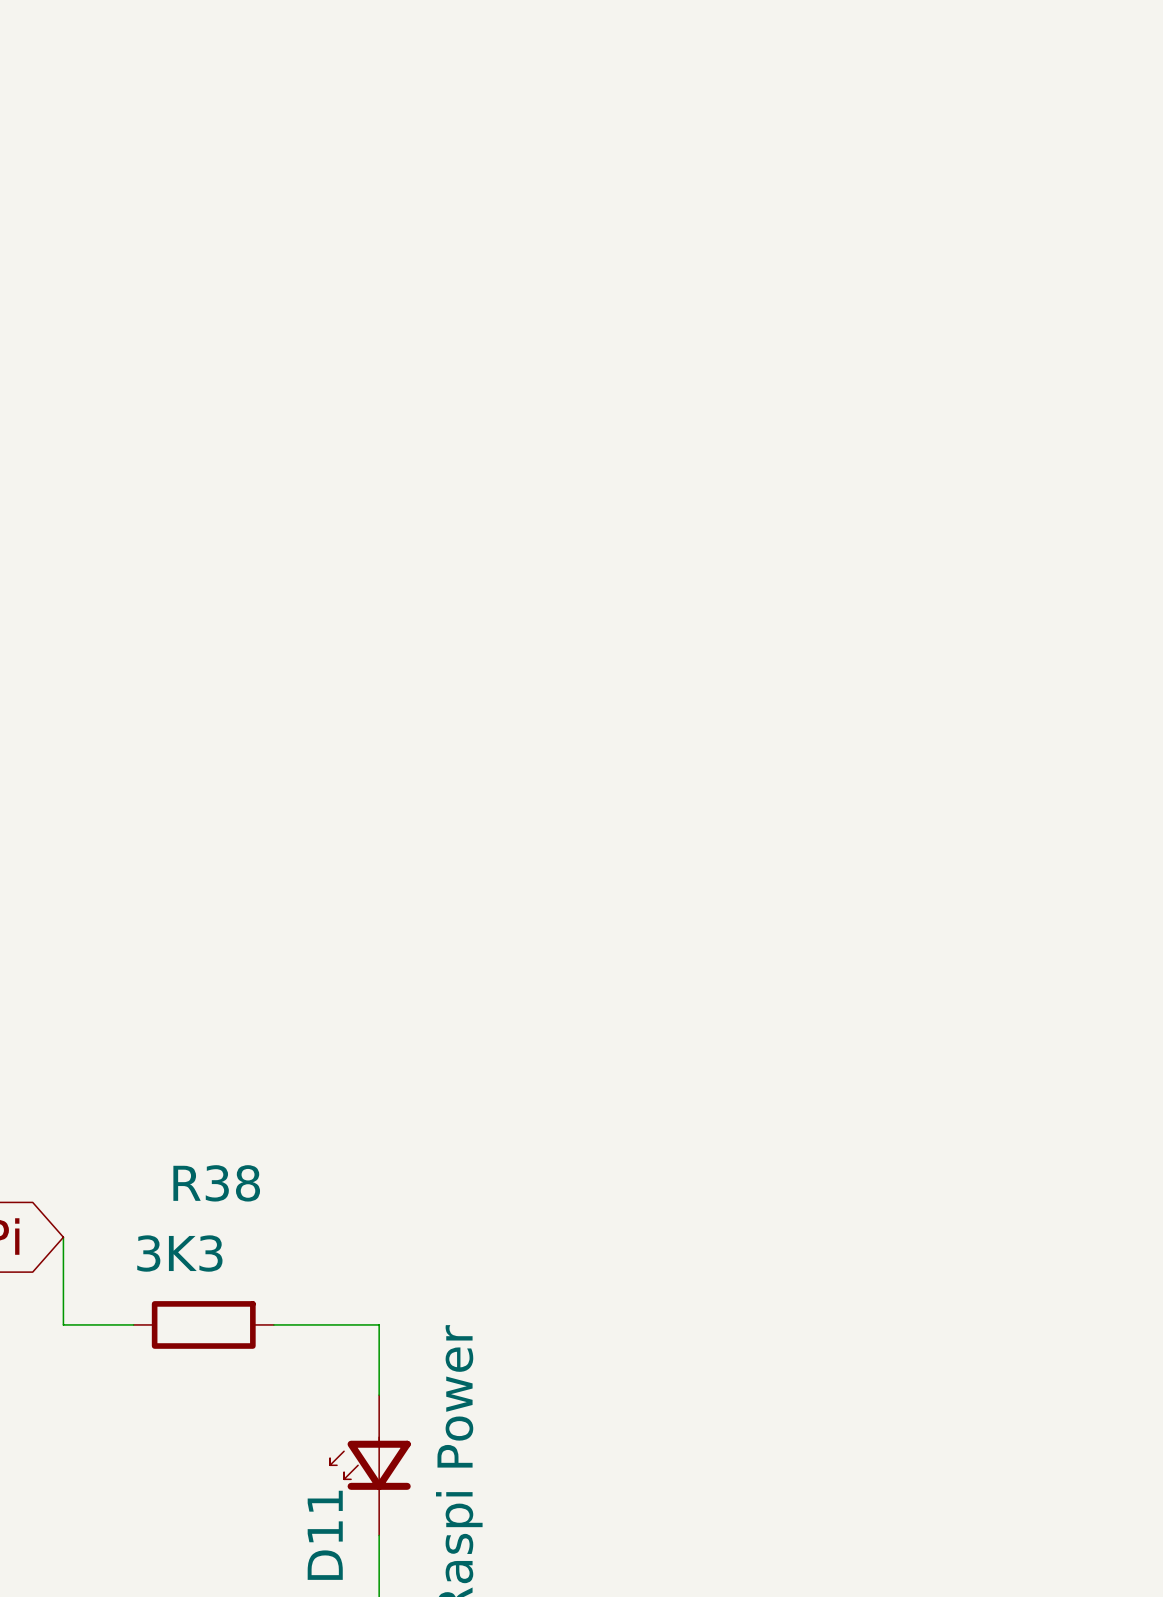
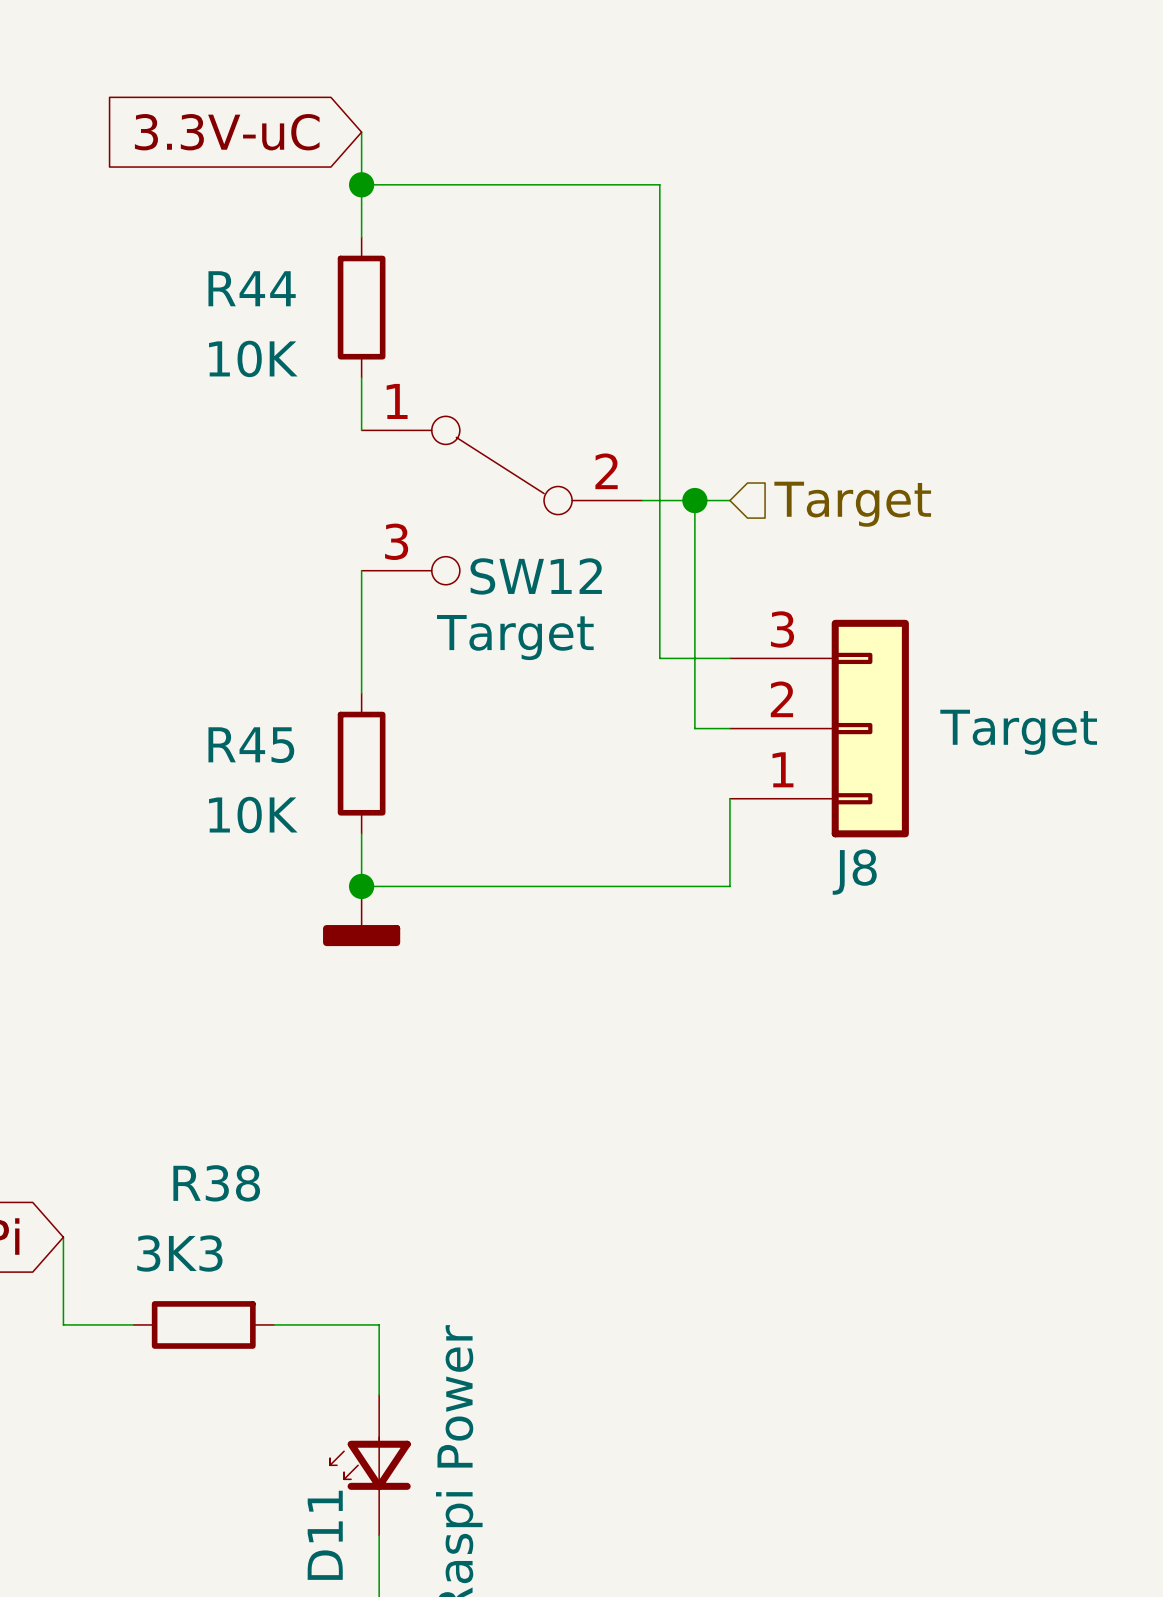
global label: none -> 3.3V-uC (227, 132)
wire: none -> (361, 132) (361, 237)
wire: none -> (361, 184) (659, 184) (659, 658) (729, 658)
junction: none -> (361, 184)
R44: none -> 10K (361, 307)
wire: none -> (361, 377) (361, 430)
SW12: none -> Target (501, 500)
wire: none -> (642, 500) (729, 500)
wire: none -> (694, 500) (694, 728) (729, 728)
junction: none -> (694, 500)
hierarchical label: none -> Target (852, 504)
wire: none -> (361, 570) (361, 693)
J8: none -> Target (819, 728)
R45: none -> 10K (361, 763)
wire: none -> (729, 798) (729, 886) (361, 886) (361, 833)
junction: none -> (361, 886)
power symbol: none -> (361, 916)

